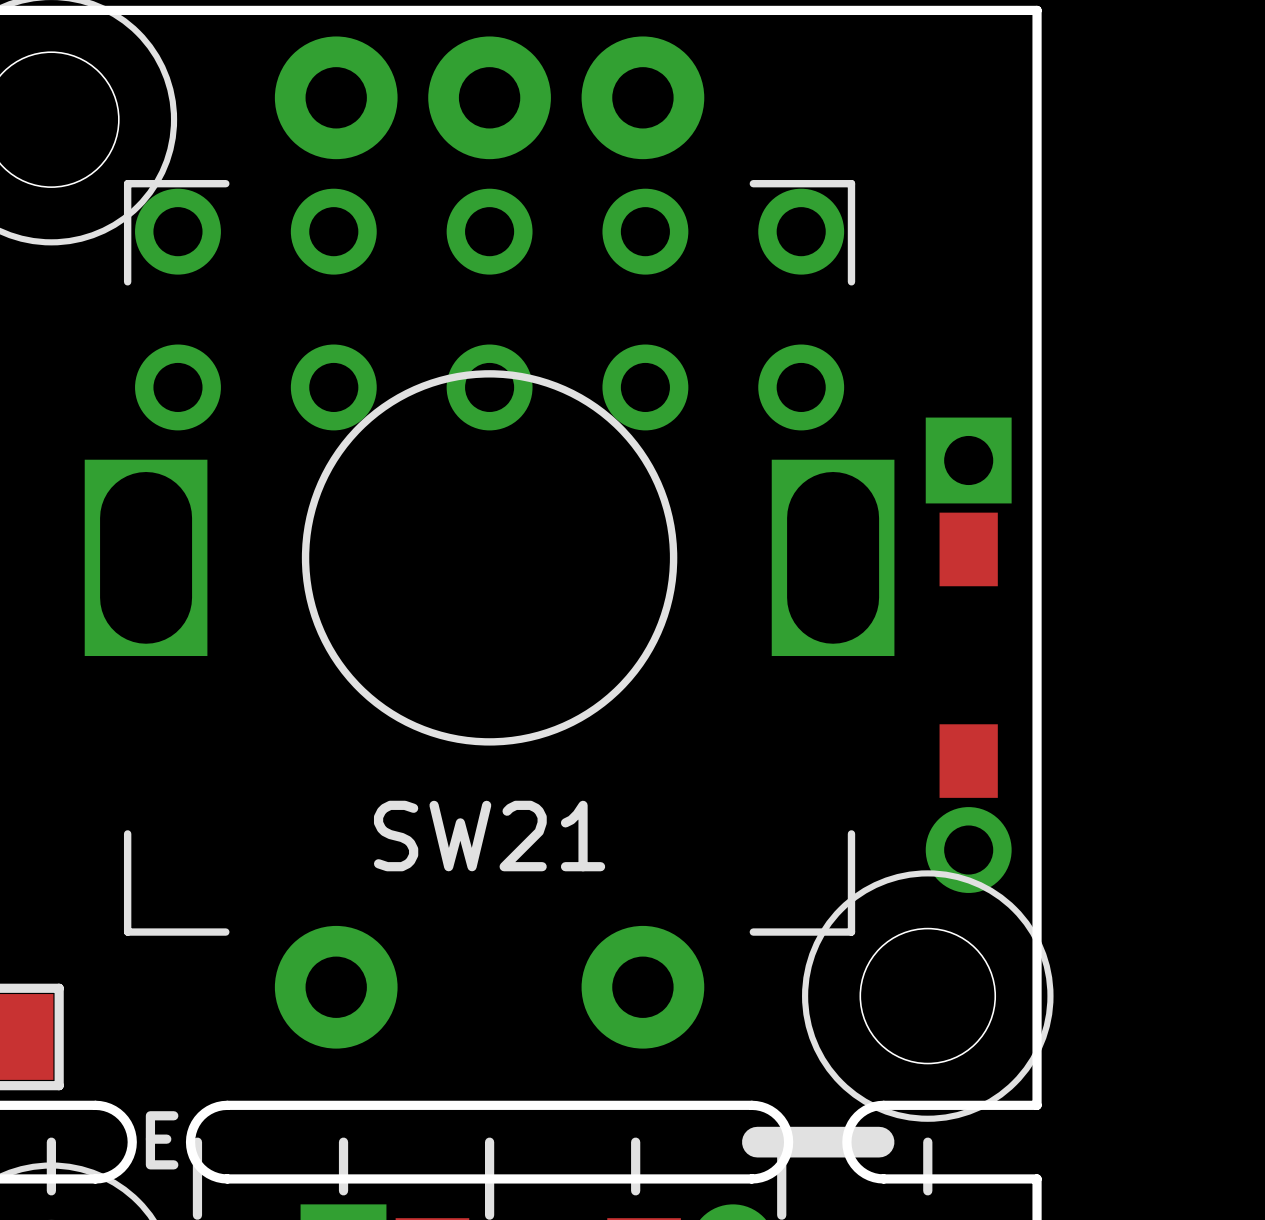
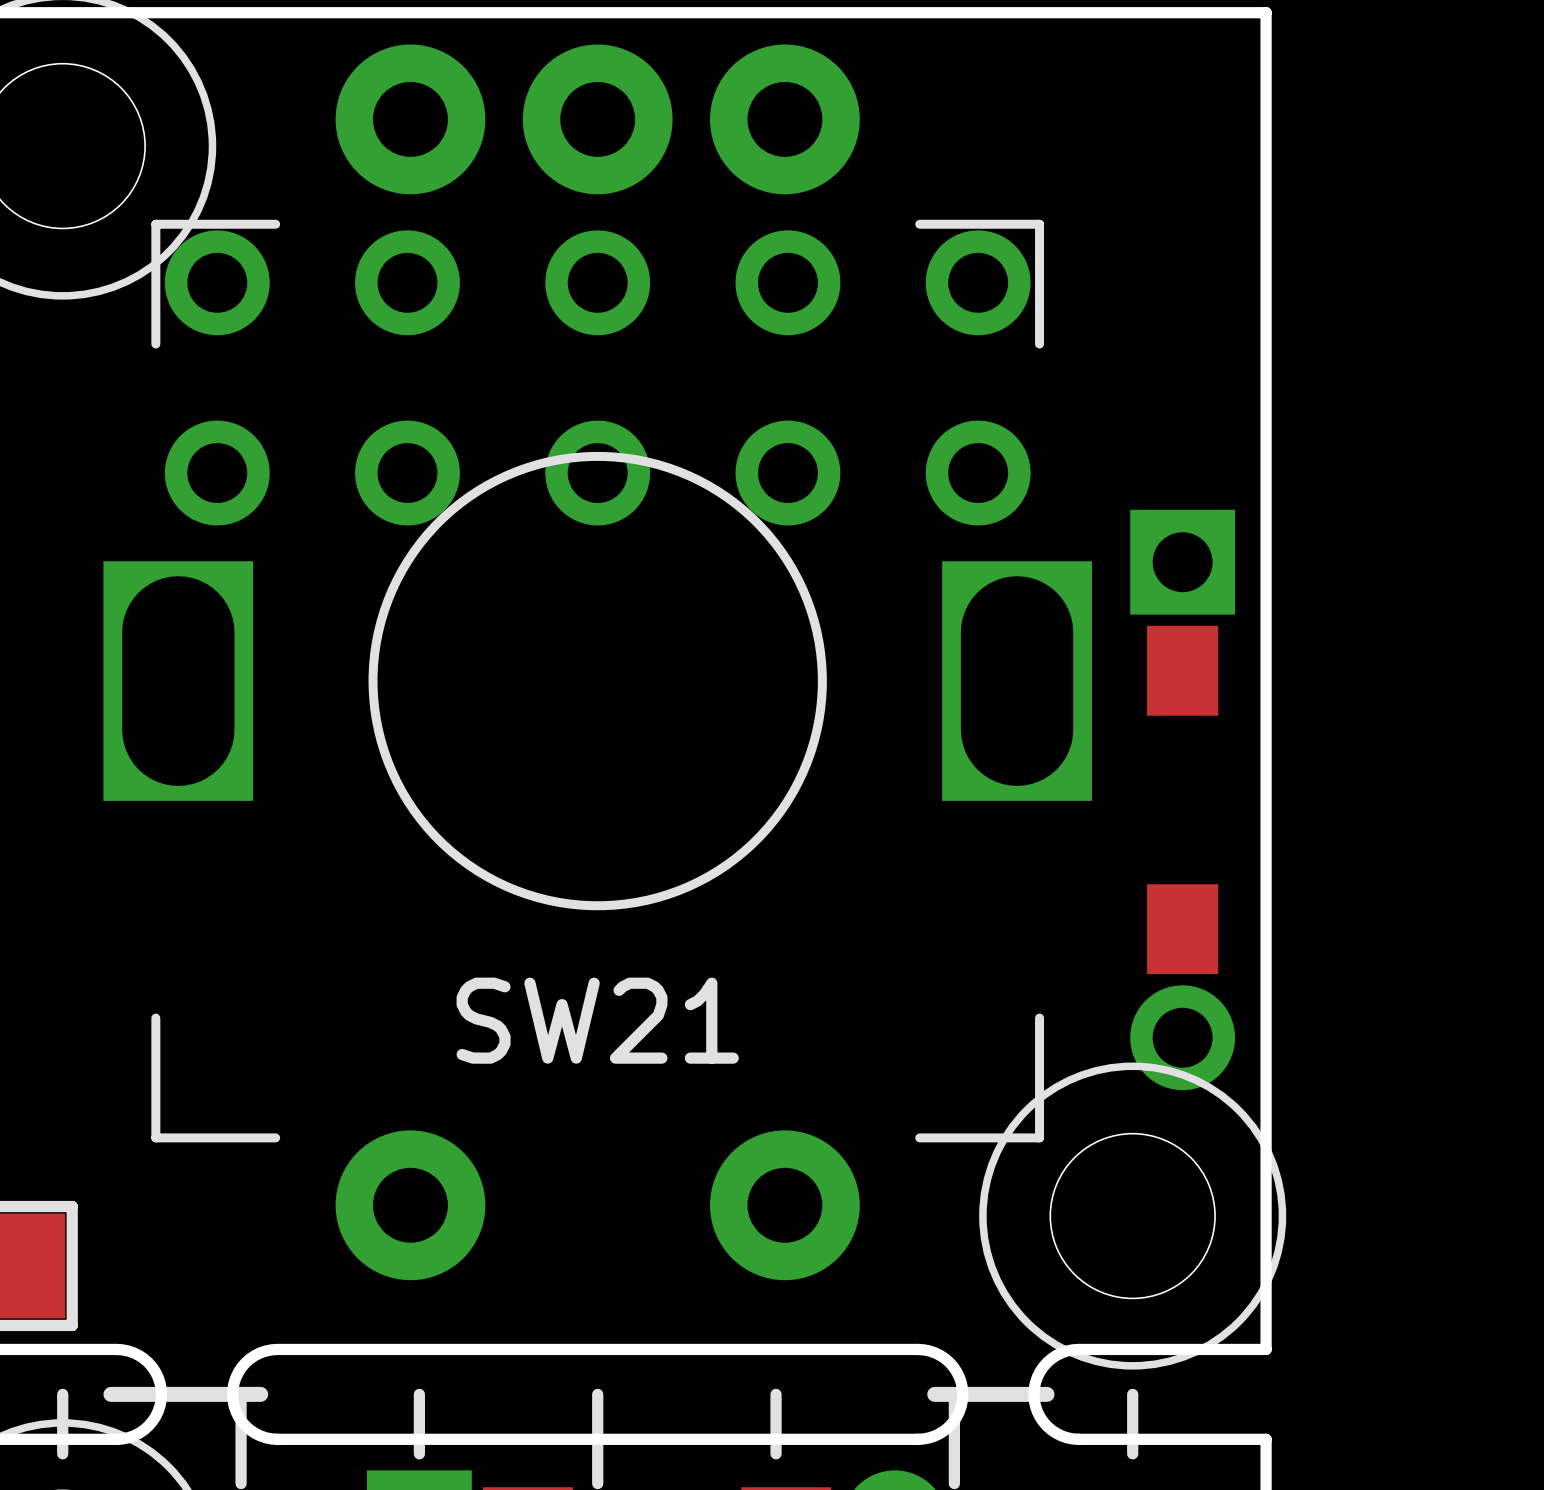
drawing shape: [185, 1100, 794, 1184] -> [103, 1343, 1055, 1445]
text: E (162, 1140) -> none
line: (757, 1142) (879, 1142) -> none

